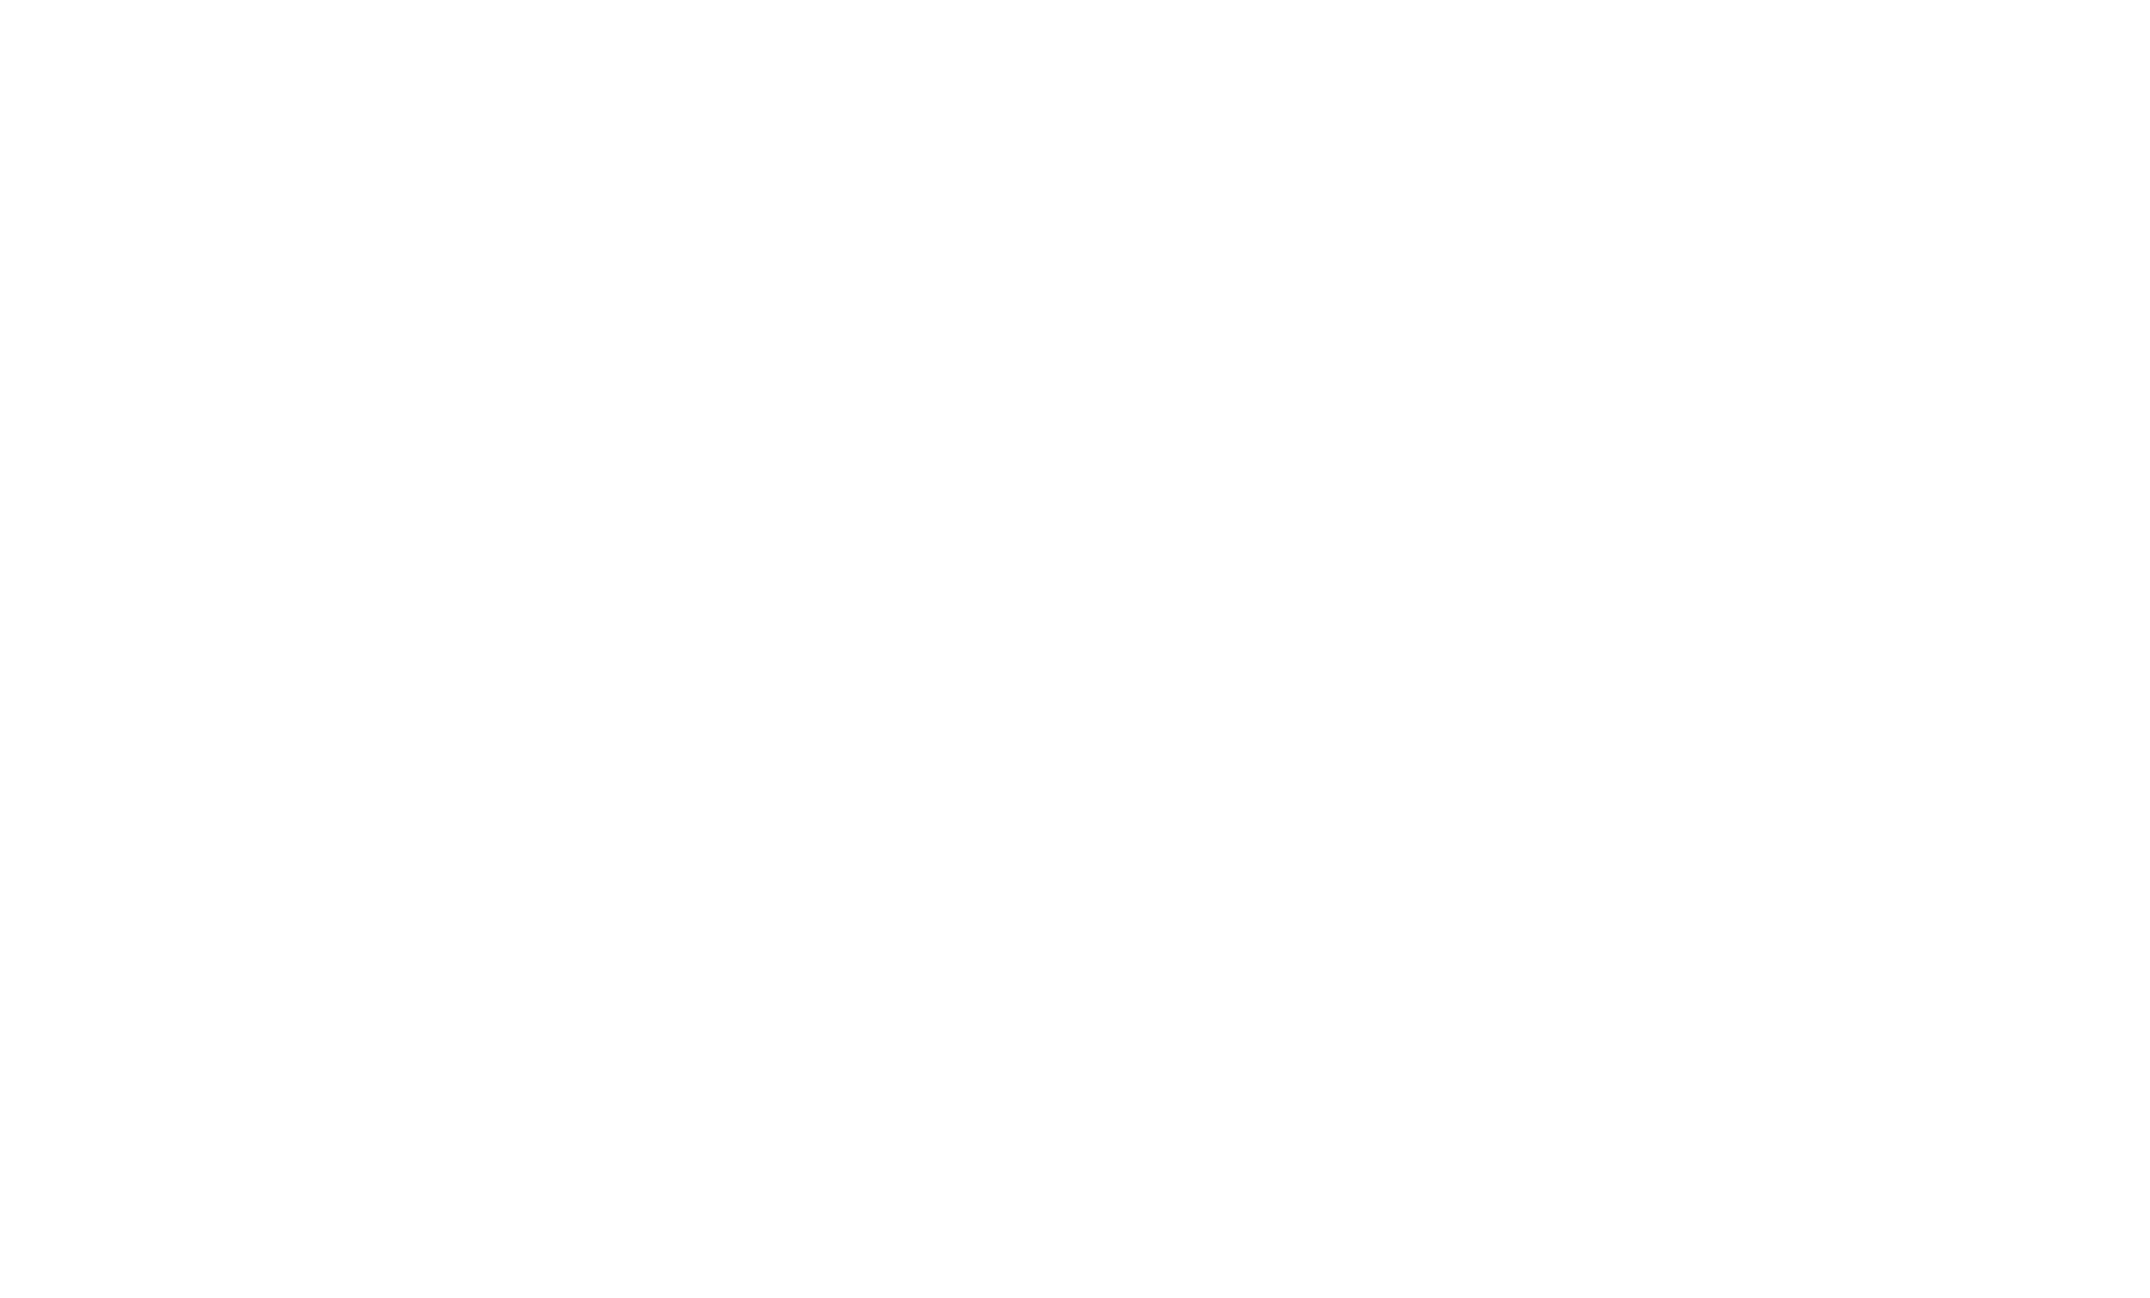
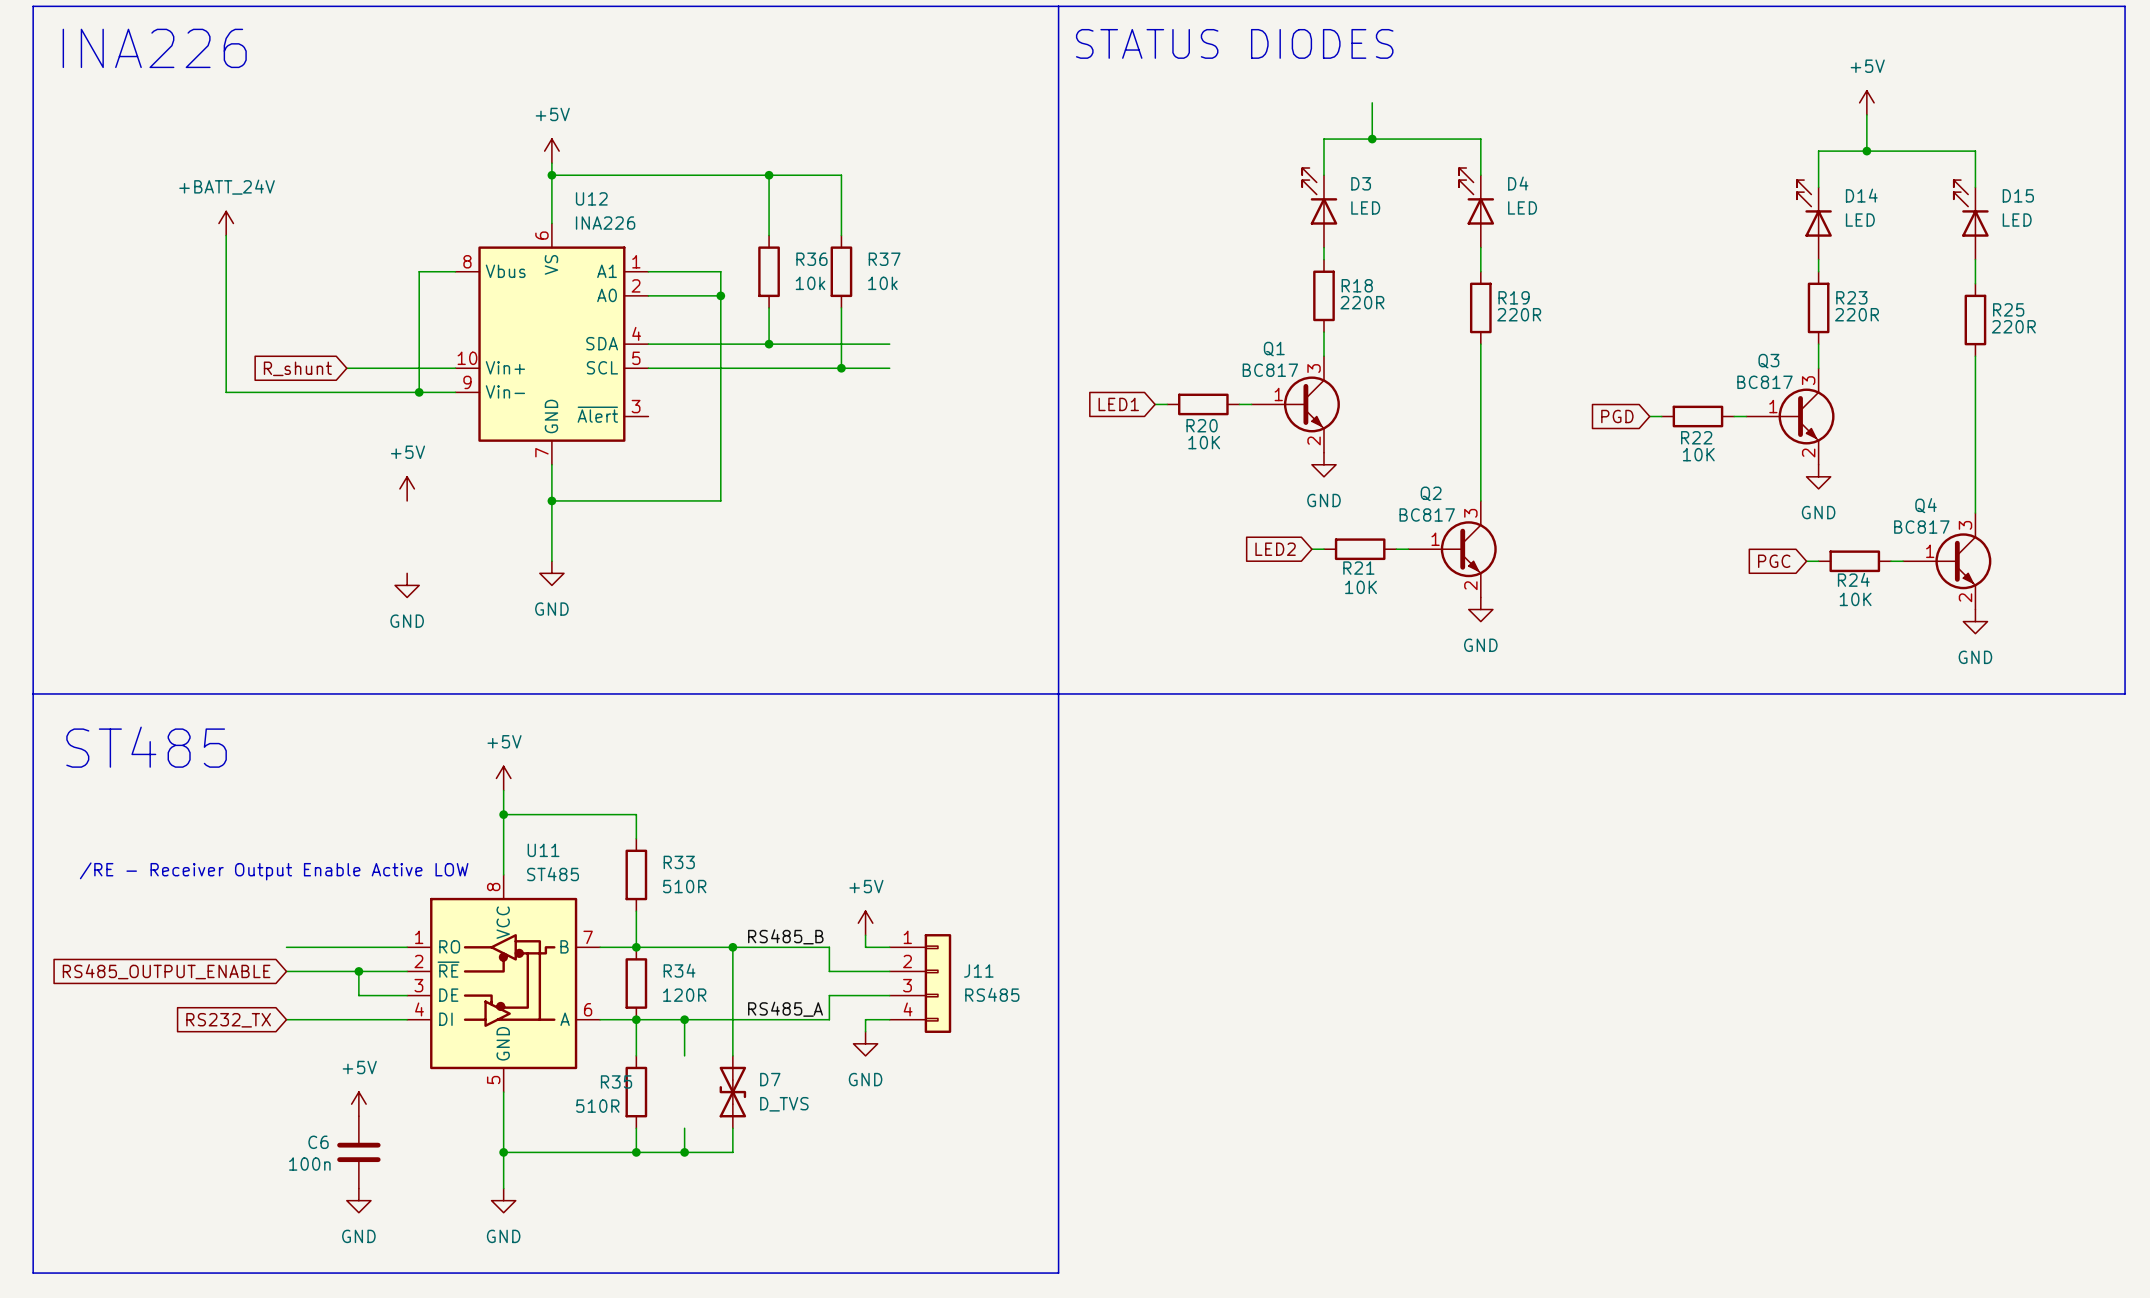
line: none -> (1058, 6) (1058, 1273) (33, 1273) (33, 6) (2125, 6) (2125, 693) (33, 693)
text: none -> STATUS DIODES (1234, 43)
text: none -> INA226 (154, 48)
wire: none -> (1372, 102) (1372, 139)
power symbol: none -> +5V (1866, 102)
wire: none -> (1866, 114) (1866, 151)
junction: none -> (1372, 139)
power symbol: none -> +5V (551, 151)
junction: none -> (1866, 151)
wire: none -> (551, 163) (551, 223)
wire: none -> (551, 175) (841, 175) (841, 235)
junction: none -> (551, 175)
wire: none -> (769, 175) (769, 235)
junction: none -> (769, 175)
wire: none -> (1323, 175) (1323, 139) (1480, 139) (1480, 175)
wire: none -> (1818, 187) (1818, 151) (1975, 151) (1975, 187)
D3: none -> LED (1319, 207)
D4: none -> LED (1476, 207)
D14: none -> LED (1814, 219)
D15: none -> LED (1971, 219)
power symbol: none -> +BATT_24V (226, 223)
wire: none -> (226, 235) (226, 392) (455, 392)
wire: none -> (1323, 247) (1323, 259)
wire: none -> (1480, 247) (1480, 271)
wire: none -> (1818, 259) (1818, 271)
wire: none -> (1975, 259) (1975, 283)
wire: none -> (455, 271) (419, 271) (419, 392)
wire: none -> (648, 271) (720, 271) (720, 500) (551, 500)
R36: none -> 10k (769, 271)
R37: none -> 10k (841, 271)
wire: none -> (648, 295) (720, 295)
junction: none -> (720, 295)
R18: none -> 220R (1323, 295)
wire: none -> (769, 307) (769, 344)
wire: none -> (841, 307) (841, 368)
R19: none -> 220R (1480, 307)
R23: none -> 220R (1818, 307)
R25: none -> 220R (1975, 320)
wire: none -> (1323, 332) (1323, 356)
U12: none -> INA226 (551, 344)
wire: none -> (648, 344) (889, 344)
junction: none -> (769, 344)
wire: none -> (1480, 344) (1480, 500)
wire: none -> (1818, 344) (1818, 368)
wire: none -> (1975, 356) (1975, 513)
global label: none -> R_shunt (297, 368)
wire: none -> (346, 368) (455, 368)
wire: none -> (648, 368) (889, 368)
junction: none -> (841, 368)
junction: none -> (419, 392)
global label: none -> LED1 (1118, 404)
wire: none -> (1155, 404) (1167, 404)
R20: none -> 10K (1203, 404)
wire: none -> (1239, 404) (1251, 404)
Q1: none -> BC817 (1295, 404)
global label: none -> PGD (1617, 416)
wire: none -> (1649, 416) (1661, 416)
R22: none -> 10K (1697, 416)
wire: none -> (1734, 416) (1746, 416)
Q3: none -> BC817 (1790, 416)
wire: none -> (551, 464) (551, 561)
power symbol: none -> GND (1323, 464)
power symbol: none -> GND (1818, 476)
power symbol: none -> +5V (407, 488)
junction: none -> (551, 500)
global label: none -> LED2 (1275, 549)
wire: none -> (1311, 549) (1323, 549)
R21: none -> 10K (1360, 549)
wire: none -> (1396, 549) (1408, 549)
Q2: none -> BC817 (1452, 549)
global label: none -> PGC (1774, 561)
wire: none -> (1806, 561) (1818, 561)
R24: none -> 10K (1854, 561)
wire: none -> (1890, 561) (1903, 561)
Q4: none -> BC817 (1947, 561)
power symbol: none -> GND (551, 573)
power symbol: none -> GND (407, 585)
power symbol: none -> GND (1480, 609)
power symbol: none -> GND (1975, 621)
text: none -> ST485 (146, 747)
power symbol: none -> +5V (503, 778)
wire: none -> (503, 790) (503, 874)
wire: none -> (503, 814) (636, 814) (636, 838)
junction: none -> (503, 814)
text: none -> /RE - Receiver Output Enable Active LOW (274, 871)
R33: none -> 510R (636, 874)
wire: none -> (636, 911) (636, 947)
power symbol: none -> +5V (865, 923)
wire: none -> (865, 935) (865, 947) (889, 947)
label: none -> RS485_B (785, 936)
wire: none -> (286, 947) (407, 947)
wire: none -> (600, 947) (829, 947) (829, 971) (889, 971)
junction: none -> (636, 947)
wire: none -> (732, 947) (732, 1055)
junction: none -> (732, 947)
global label: none -> RS485_OUTPUT_ENABLE (166, 971)
wire: none -> (286, 971) (407, 971)
wire: none -> (358, 971) (358, 995) (407, 995)
junction: none -> (358, 971)
U11: none -> ST485 (503, 983)
R34: none -> 120R (636, 983)
J11: none -> RS485 (920, 983)
wire: none -> (889, 995) (829, 995) (829, 1019) (600, 1019)
label: none -> RS485_A (785, 1009)
wire: none -> (286, 1019) (407, 1019)
wire: none -> (636, 1019) (636, 1055)
junction: none -> (636, 1019)
wire: none -> (684, 1019) (684, 1055)
junction: none -> (684, 1019)
wire: none -> (889, 1019) (865, 1019) (865, 1031)
global label: none -> RS232_TX (228, 1020)
power symbol: none -> GND (865, 1043)
wire: none -> (503, 1092) (503, 1188)
R35: none -> 510R (636, 1092)
D7: none -> D_TVS (732, 1092)
power symbol: none -> +5V (358, 1104)
wire: none -> (636, 1128) (636, 1152)
wire: none -> (684, 1128) (684, 1152)
wire: none -> (732, 1128) (732, 1152) (503, 1152)
C6: none -> 100n (358, 1152)
junction: none -> (503, 1152)
junction: none -> (636, 1152)
junction: none -> (684, 1152)
power symbol: none -> GND (358, 1200)
power symbol: none -> GND (503, 1200)

